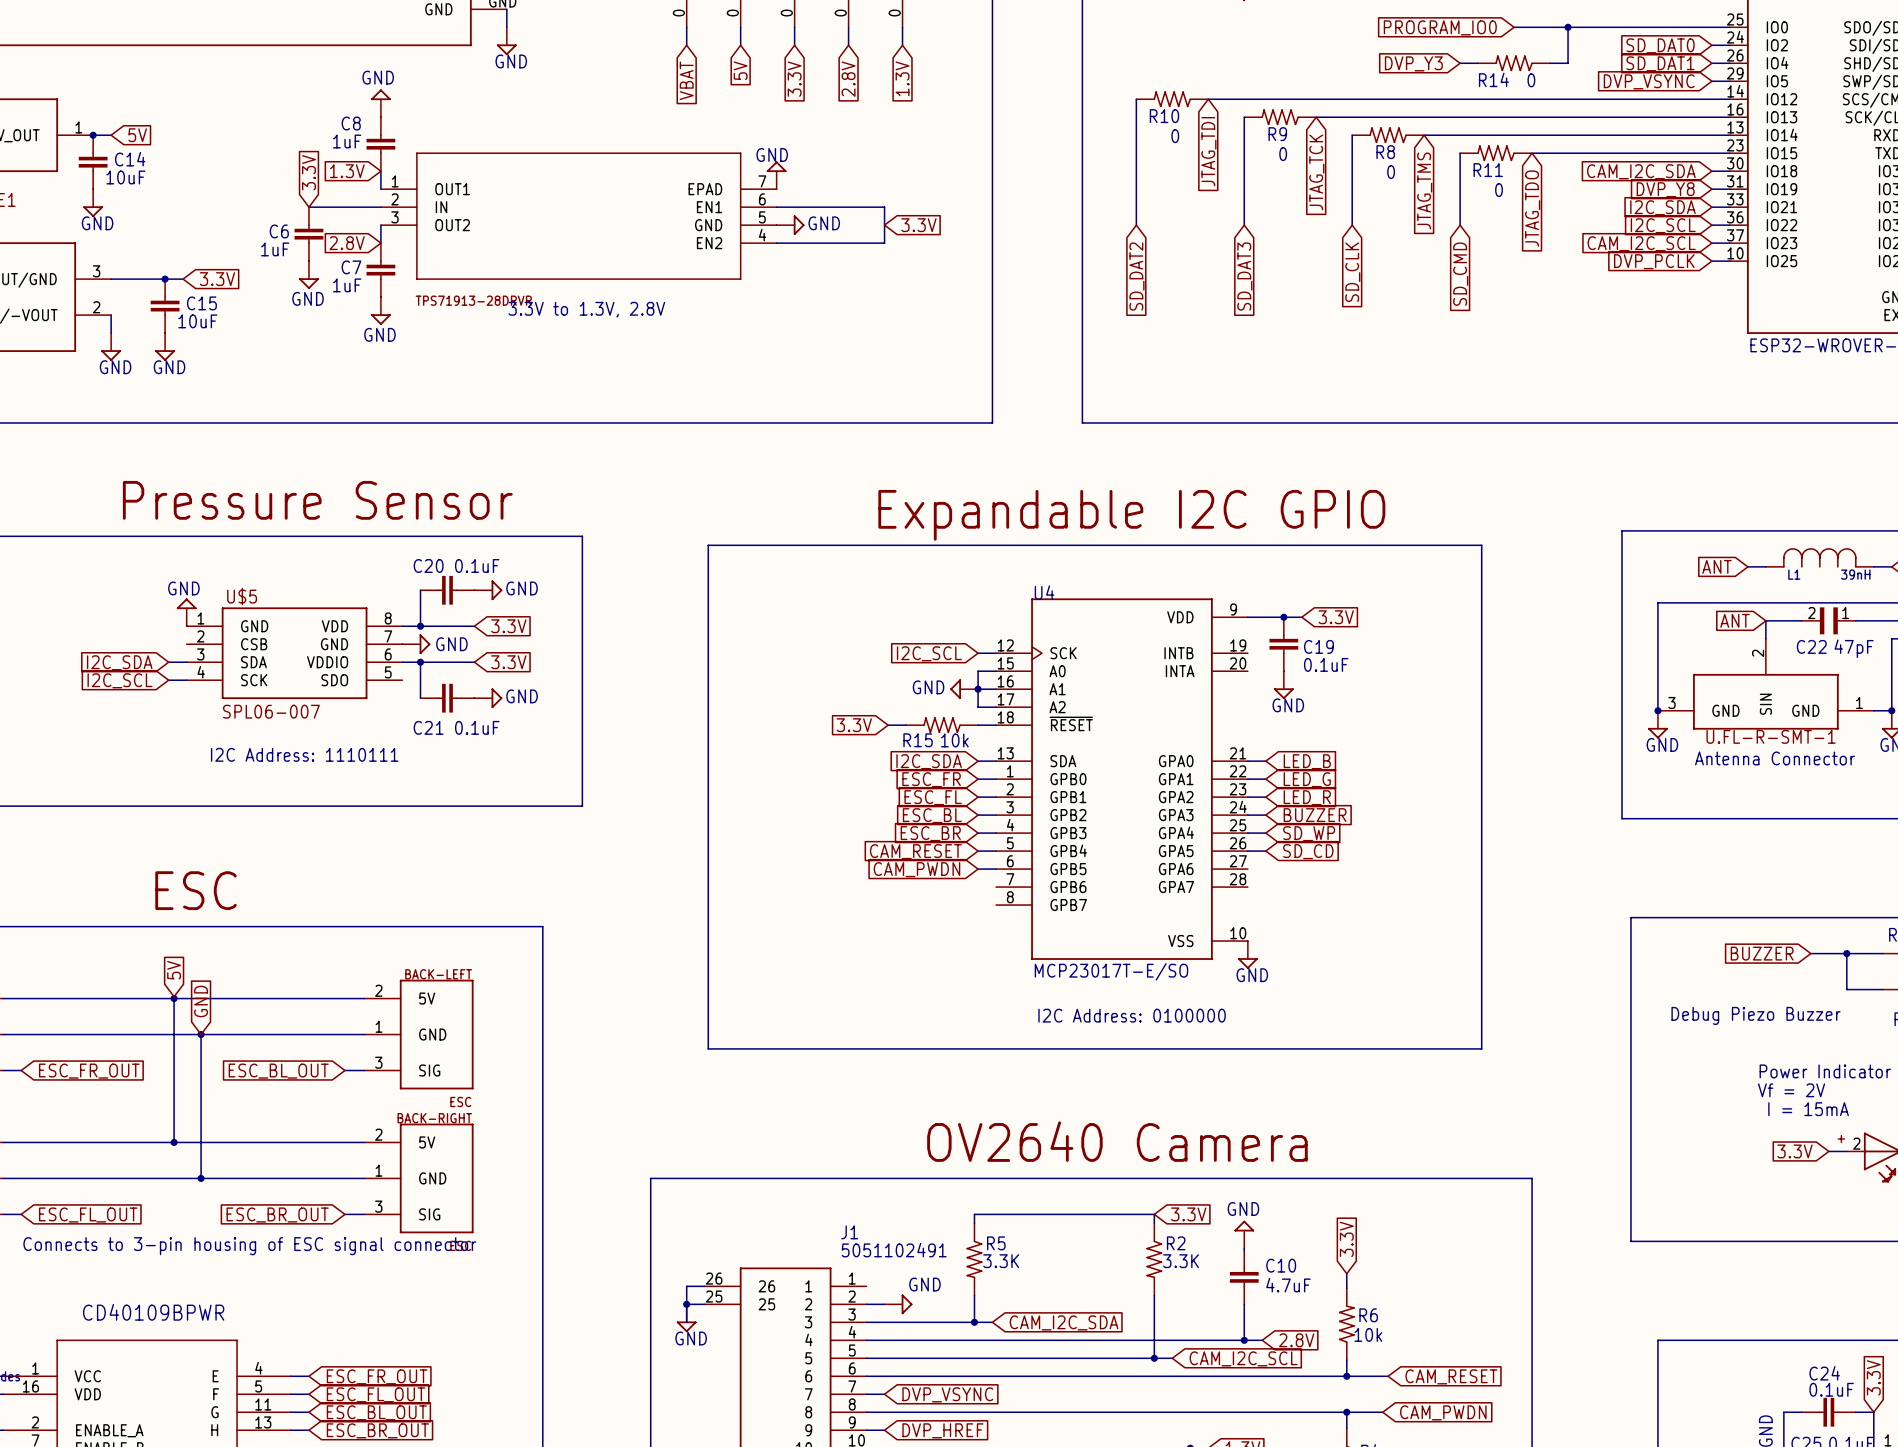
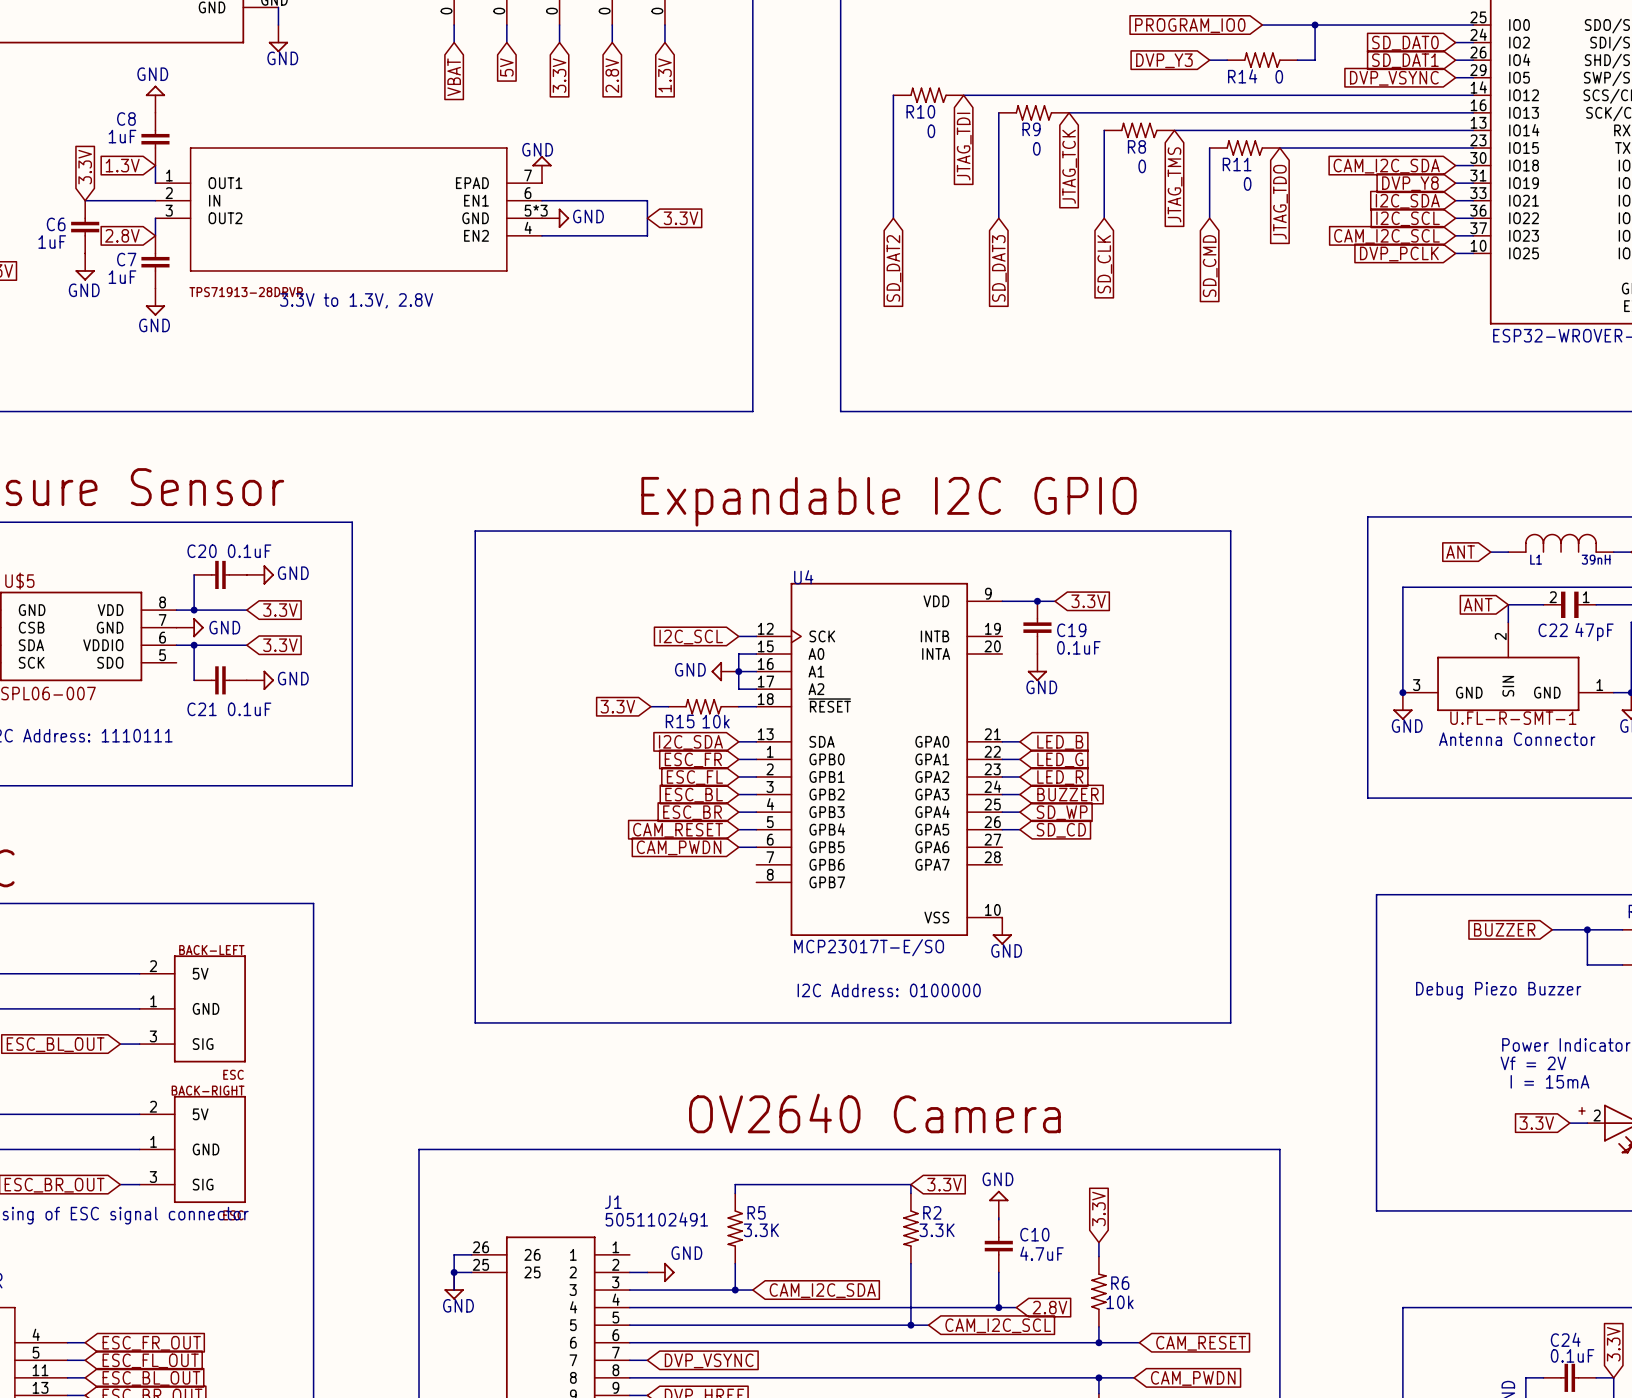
part pin number: 5 (762, 217) -> 5*3 (536, 210)

